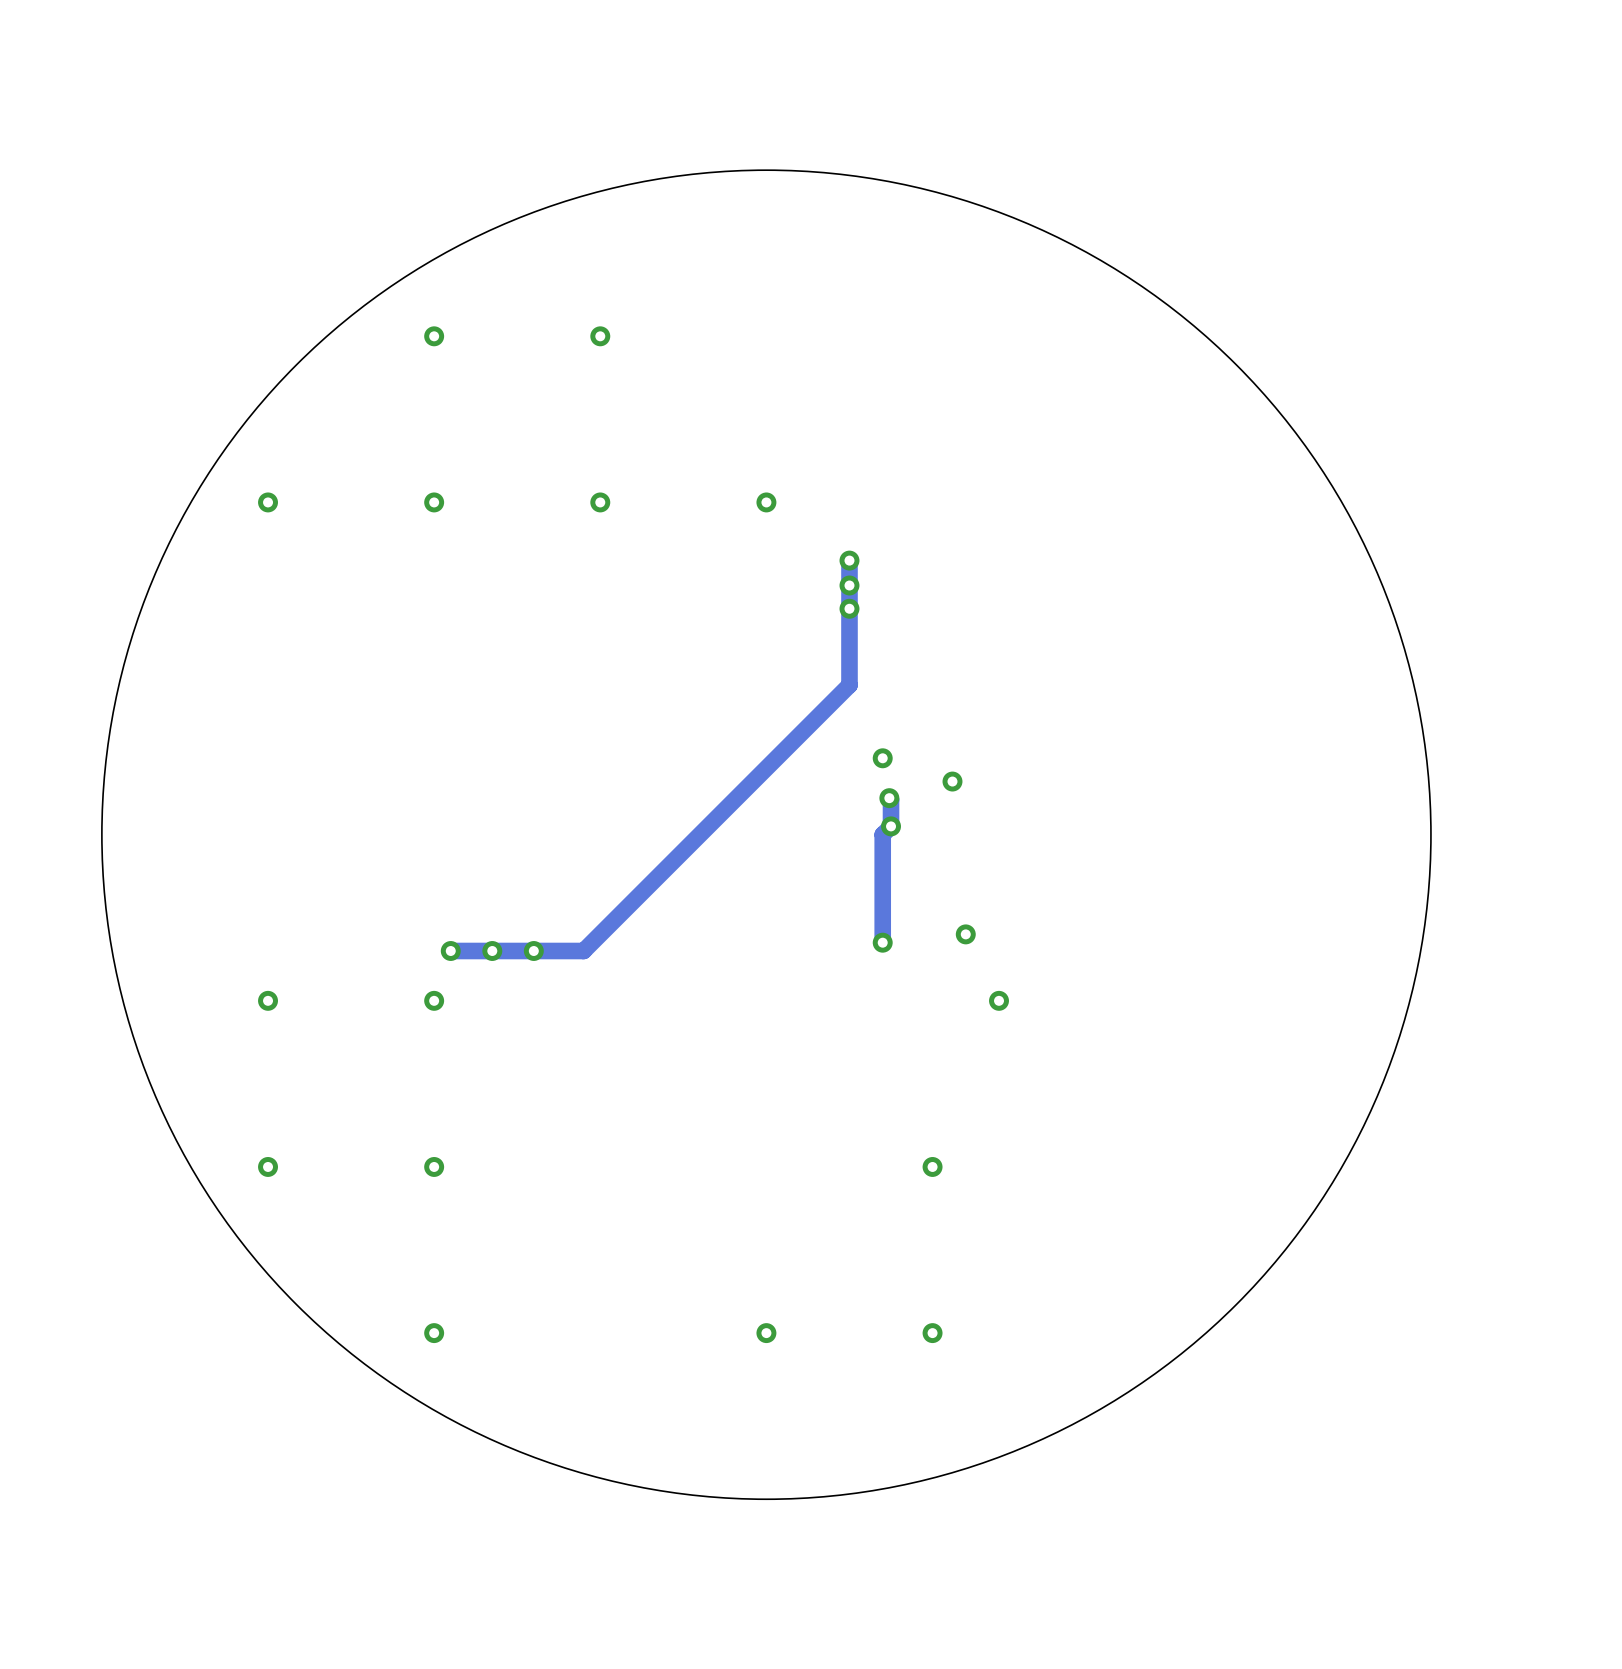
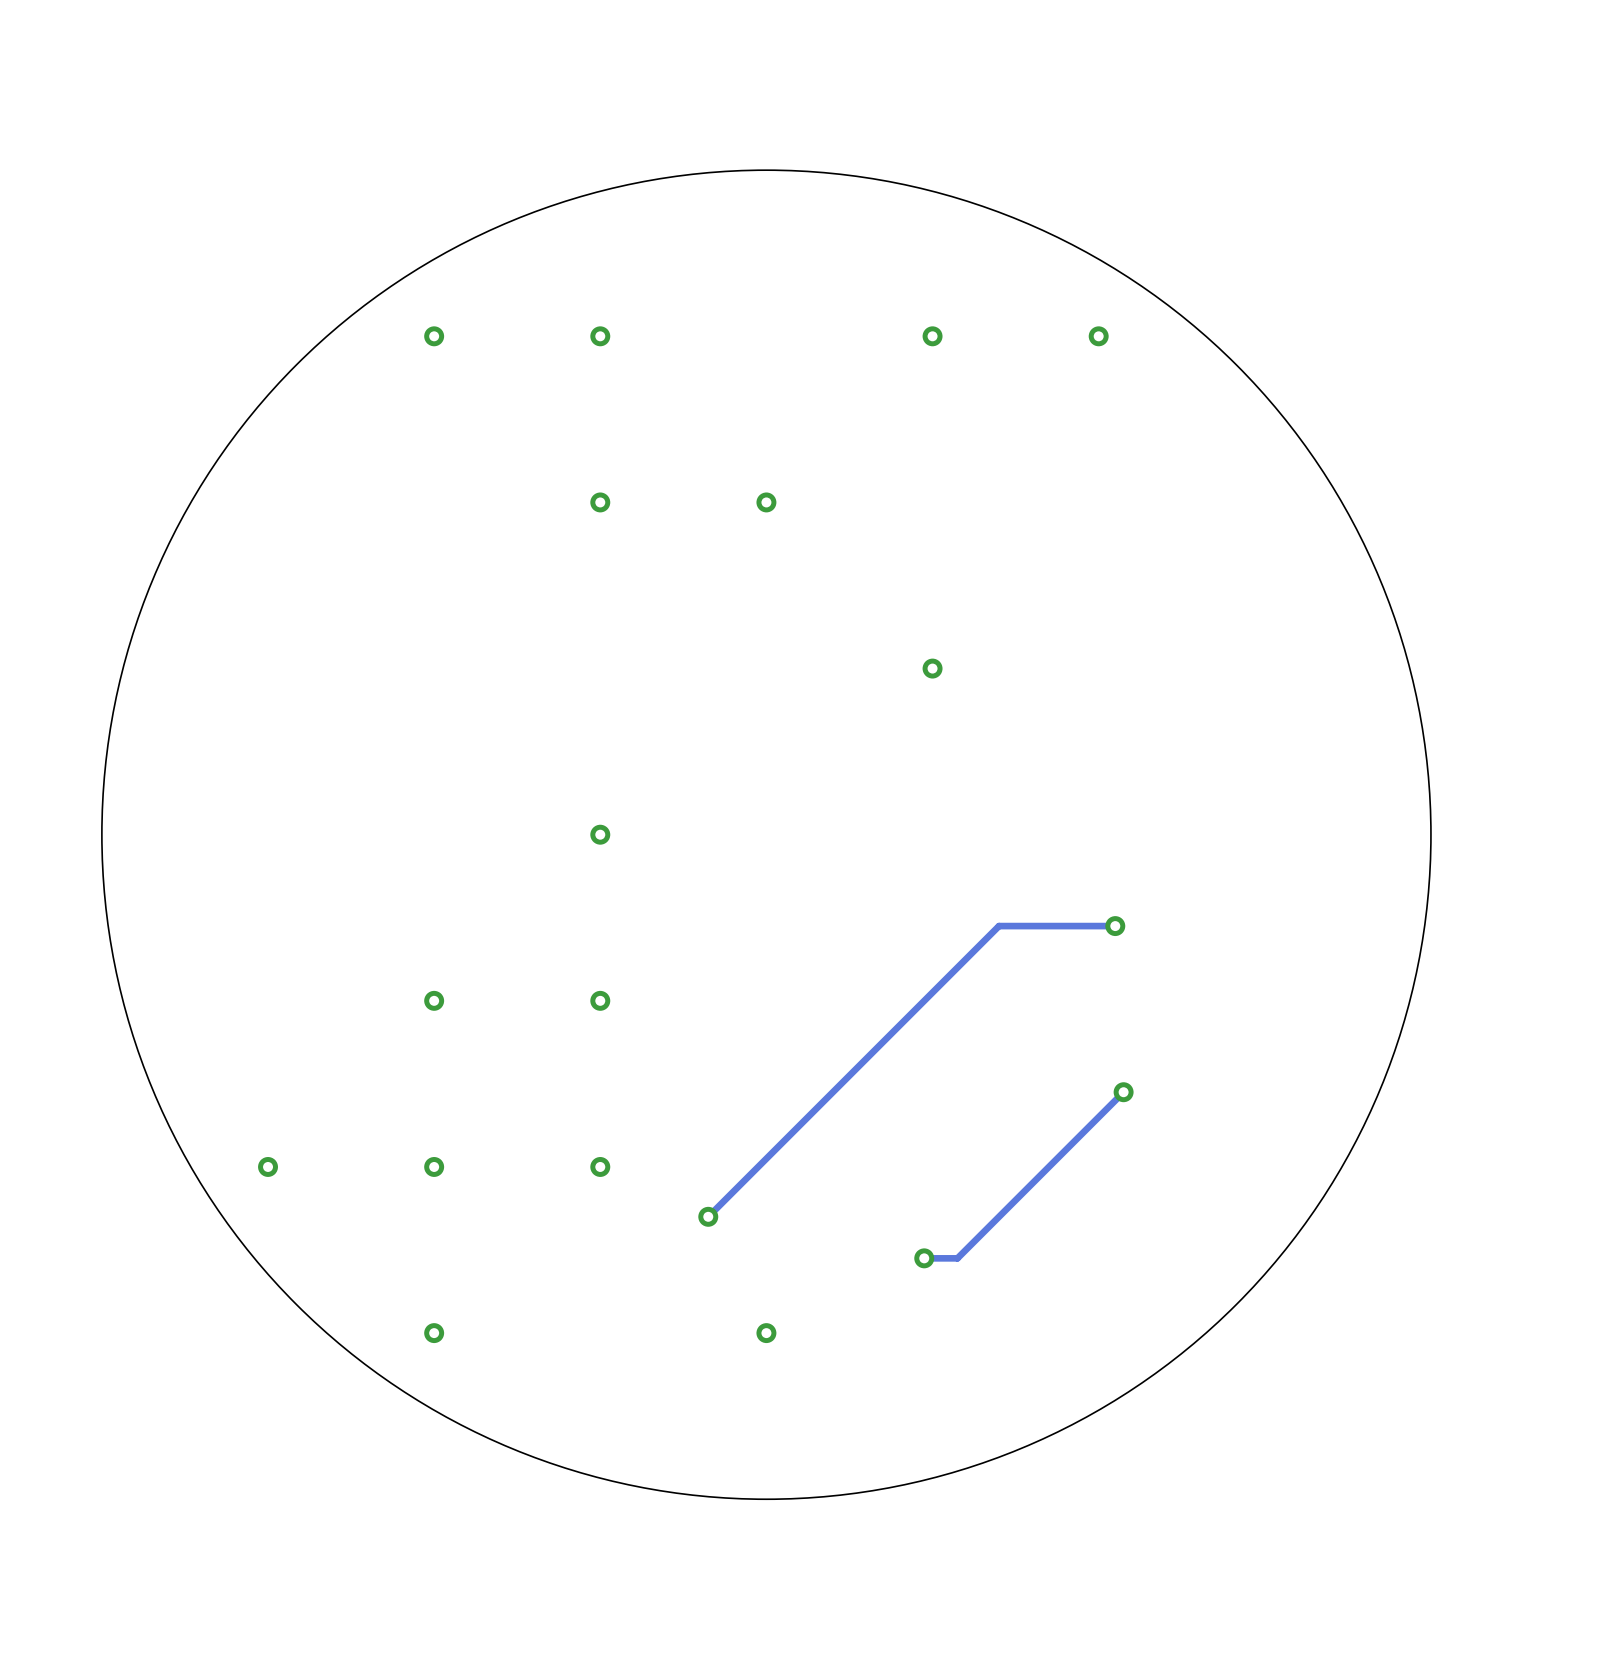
via: none -> (932, 336)
via: none -> (1098, 336)
via: (268, 502) -> none
via: (434, 502) -> none
track: (849, 560) (849, 685) (583, 951) (450, 951) -> none
via: (849, 560) -> none
via: (849, 585) -> none
via: (849, 608) -> none
via: none -> (932, 668)
via: (882, 758) -> none
via: (952, 781) -> none
track: (889, 798) (891, 799) (891, 826) (882, 834) (882, 942) -> none
via: (889, 798) -> none
via: (891, 826) -> none
via: none -> (600, 834)
track: none -> (1115, 926) (999, 926) (708, 1216)
via: none -> (1115, 926)
via: (965, 934) -> none
via: (882, 942) -> none
via: (450, 951) -> none
via: (492, 951) -> none
via: (533, 951) -> none
via: (268, 1000) -> none
via: none -> (600, 1000)
via: (999, 1000) -> none
track: none -> (1123, 1092) (957, 1258) (924, 1258)
via: none -> (1123, 1092)
via: none -> (600, 1166)
via: (932, 1166) -> none
via: none -> (708, 1216)
via: none -> (924, 1258)
via: (932, 1333) -> none

